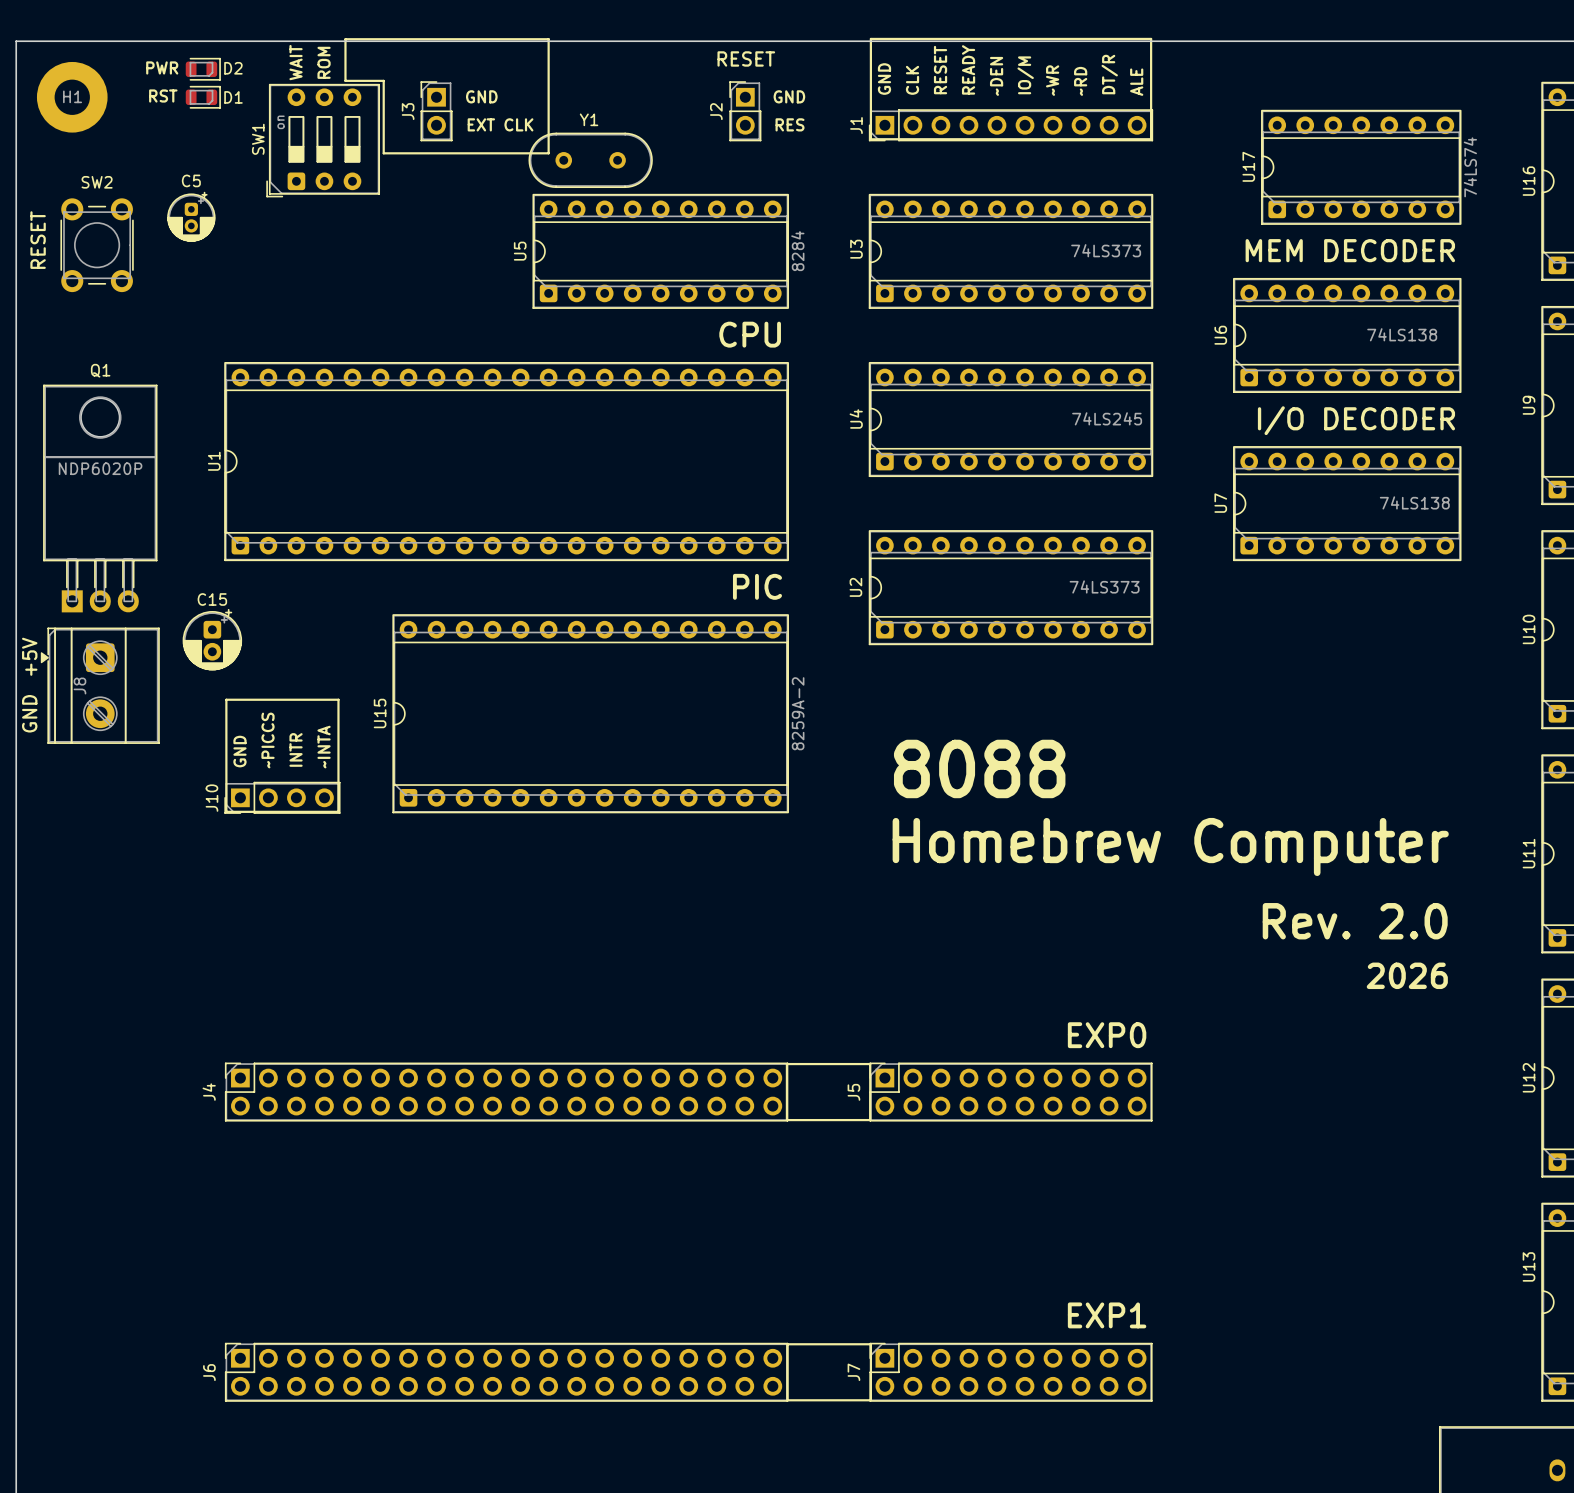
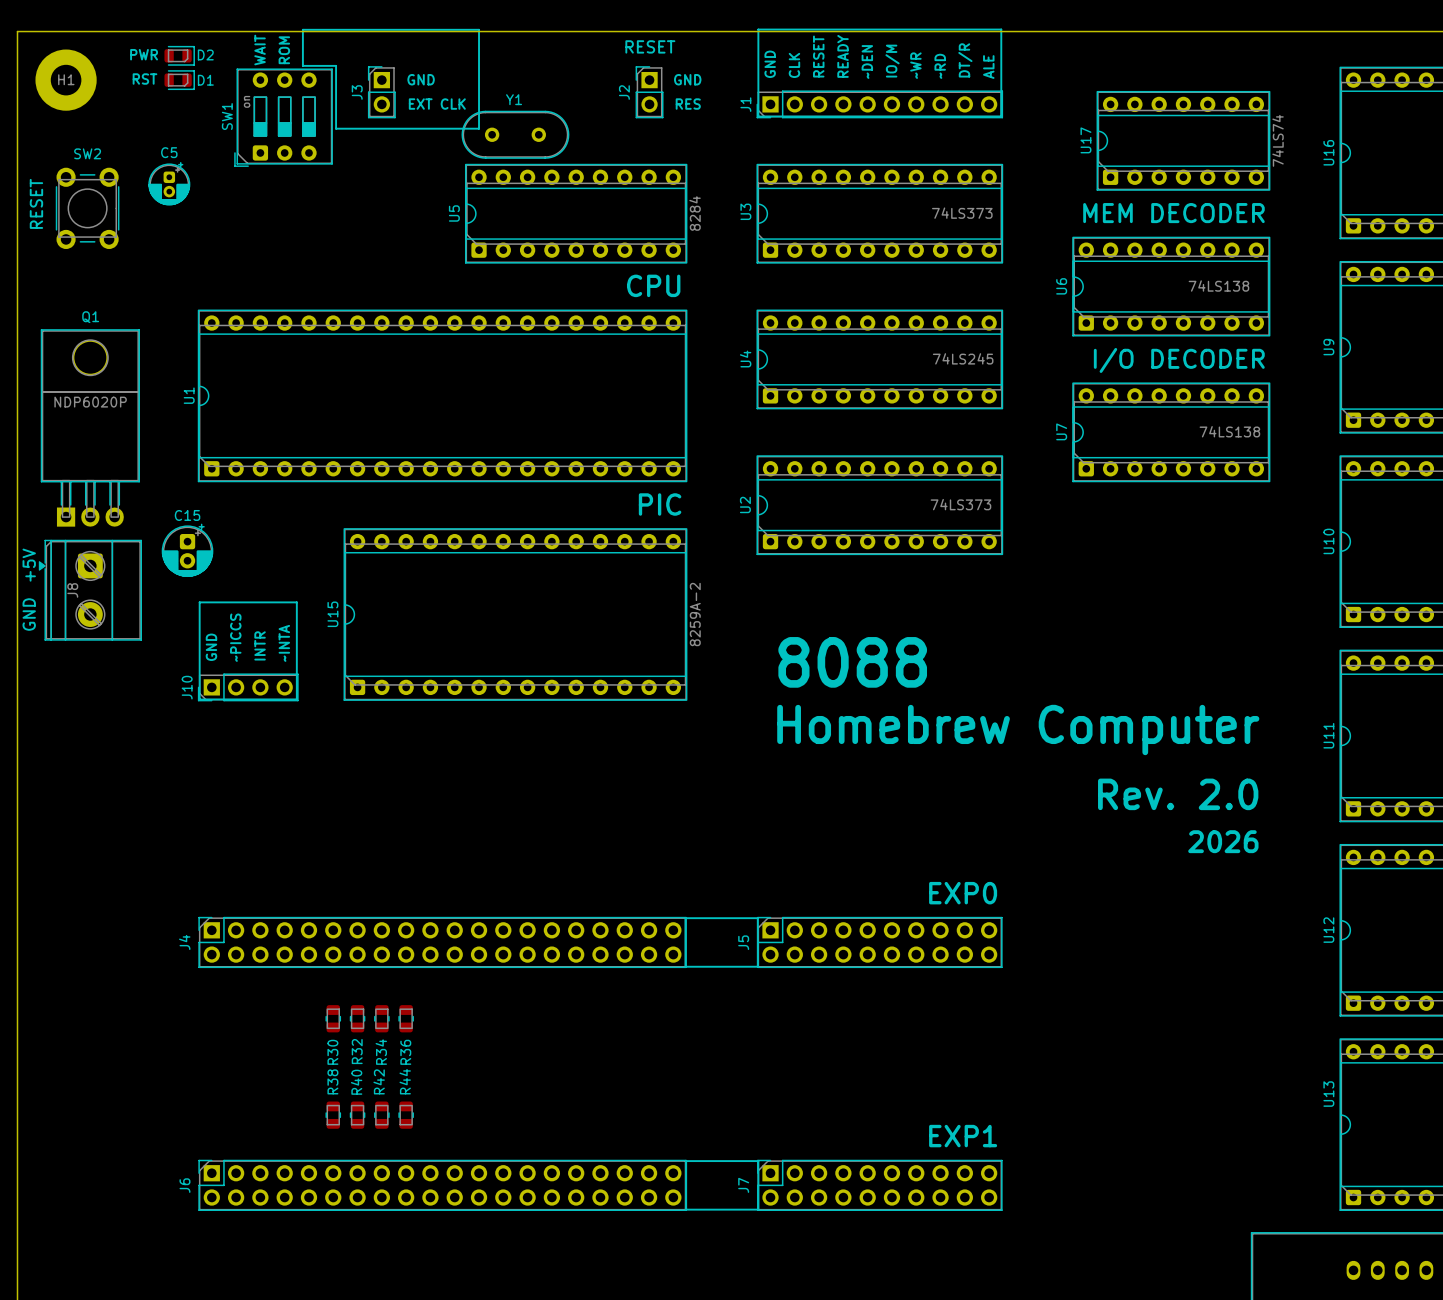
R30: none -> (333, 1018)
R32: none -> (357, 1018)
R34: none -> (381, 1018)
R36: none -> (406, 1018)
R38: none -> (333, 1115)
R40: none -> (357, 1115)
R42: none -> (381, 1115)
R44: none -> (406, 1115)

